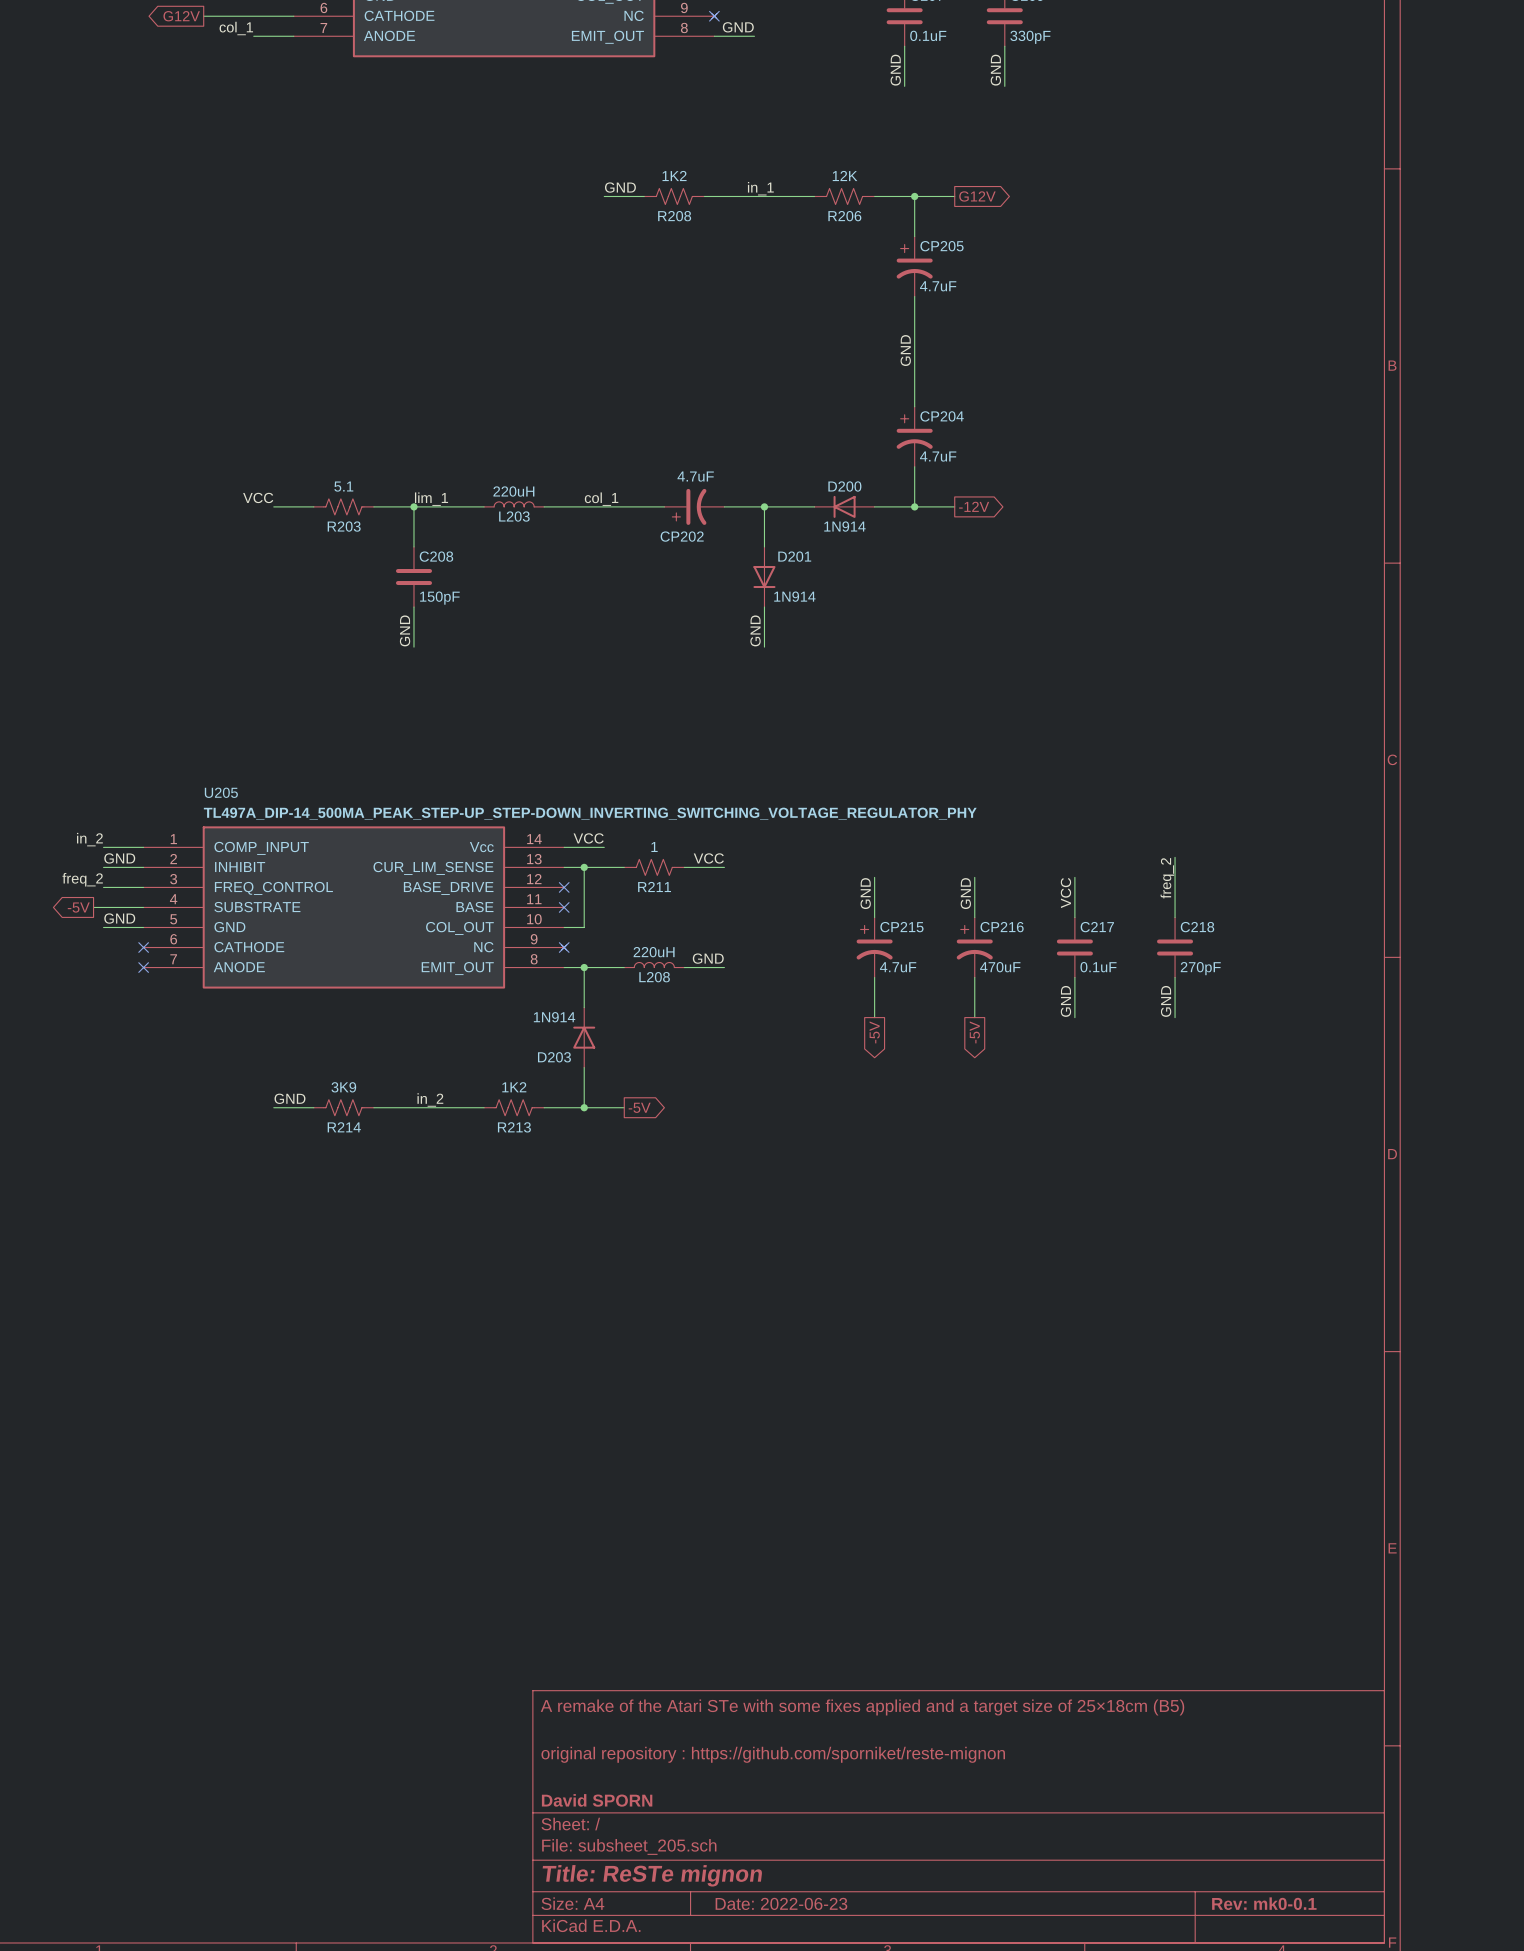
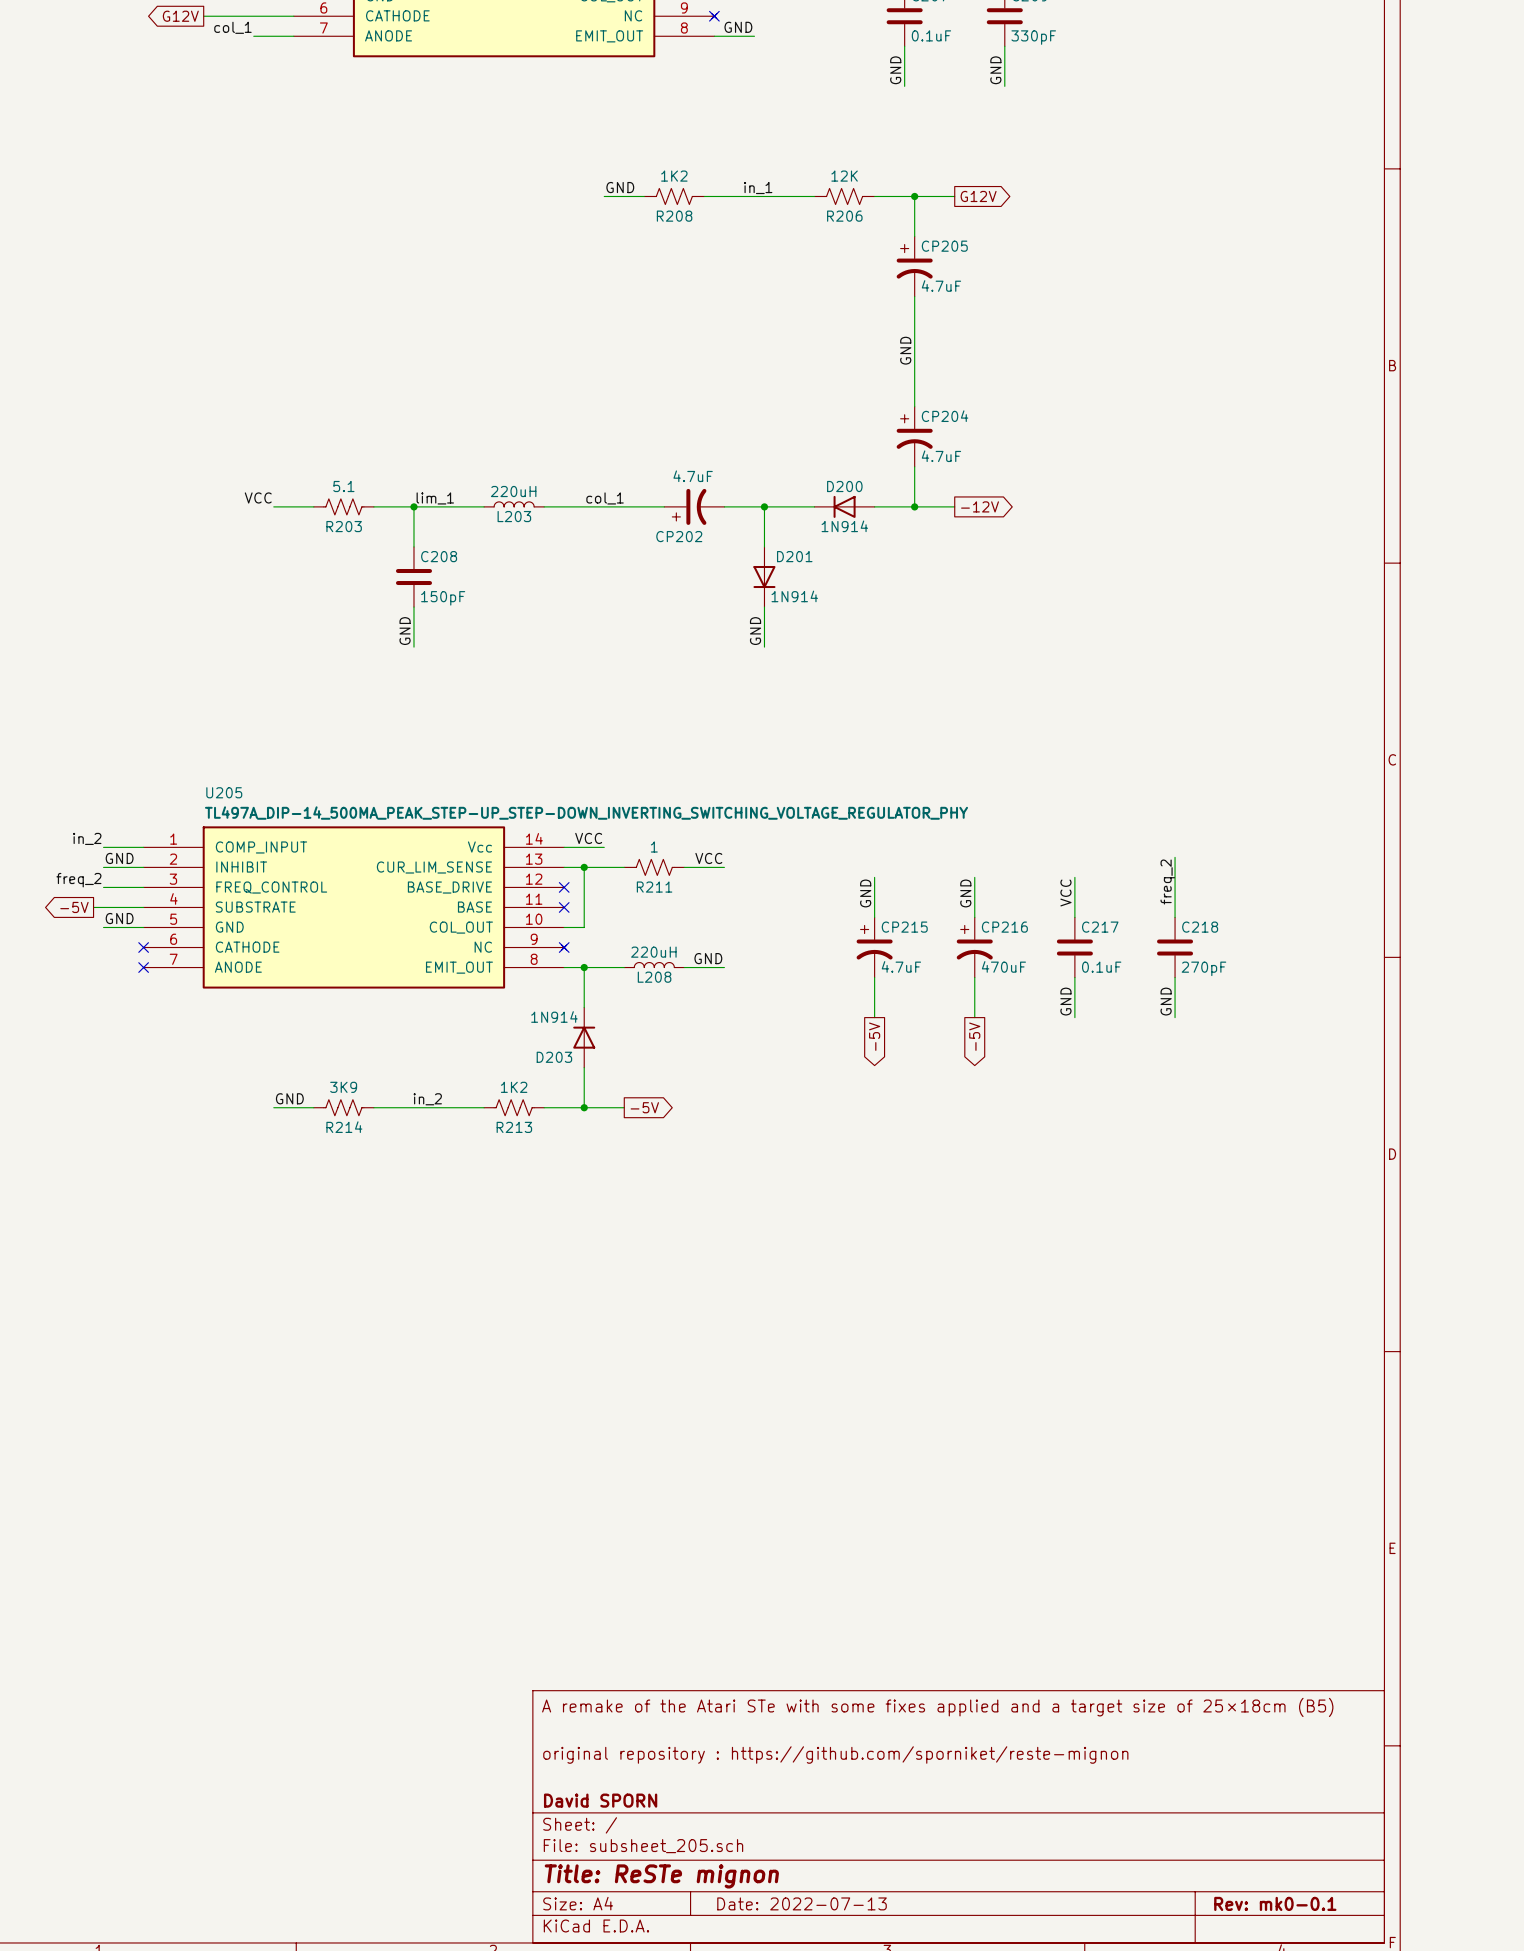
title block: Date: 2022-06-23 (781, 1903) -> Date: 2022-07-13 (802, 1903)

